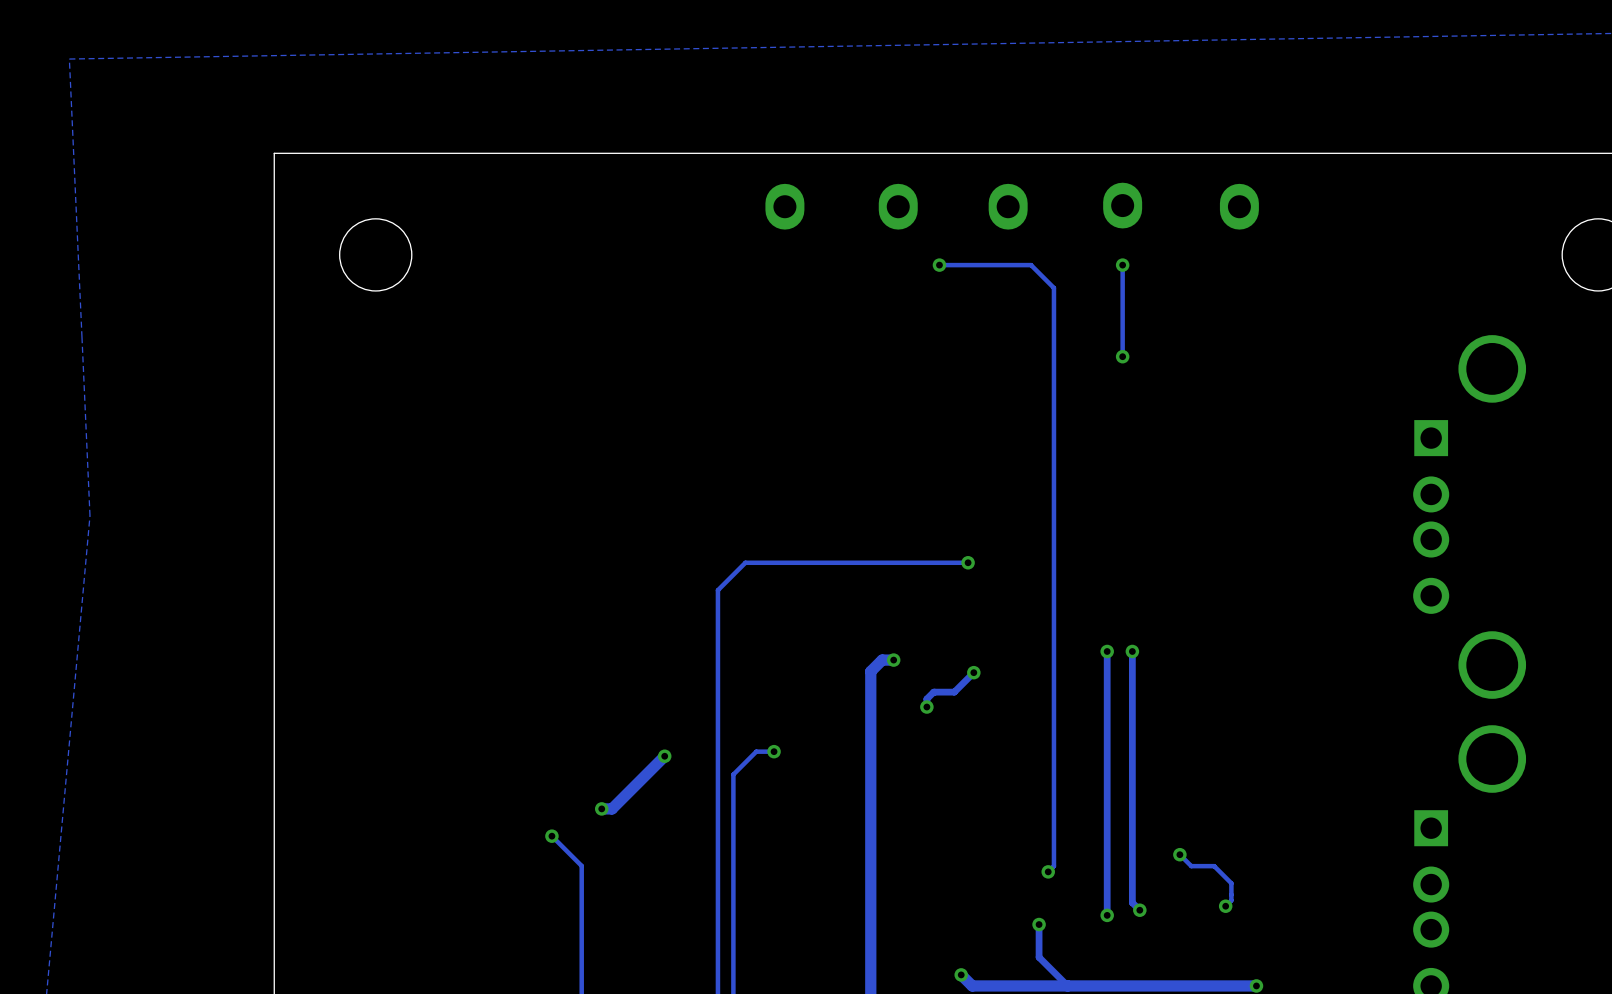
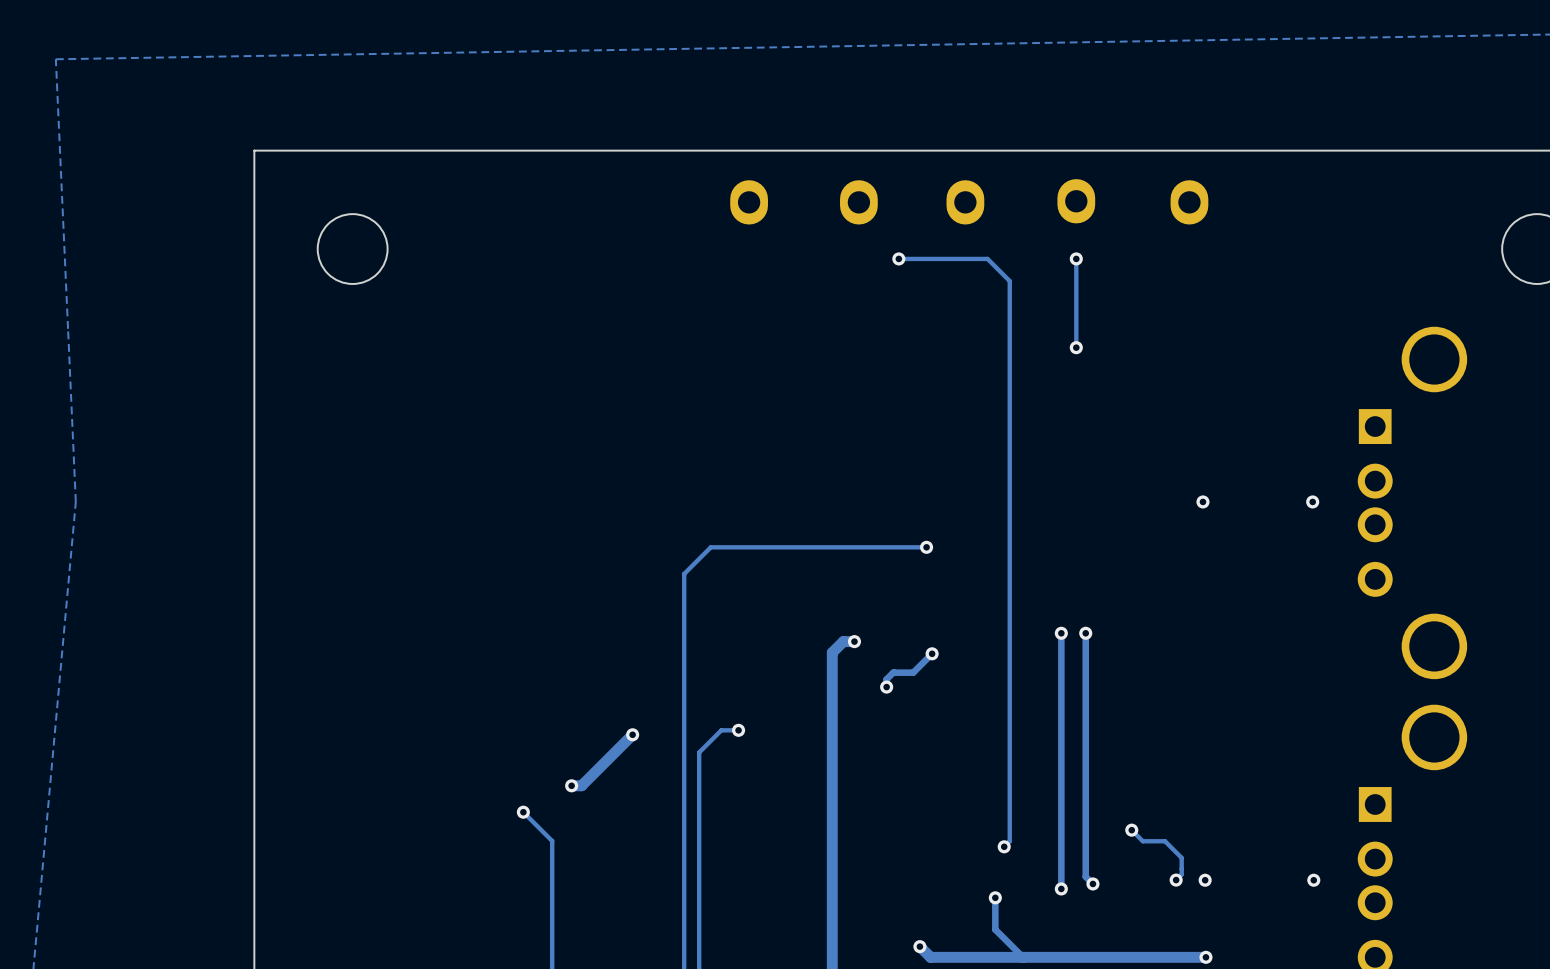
via: none -> (1202, 501)
via: none -> (1312, 501)
via: none -> (1205, 880)
via: none -> (1313, 880)

